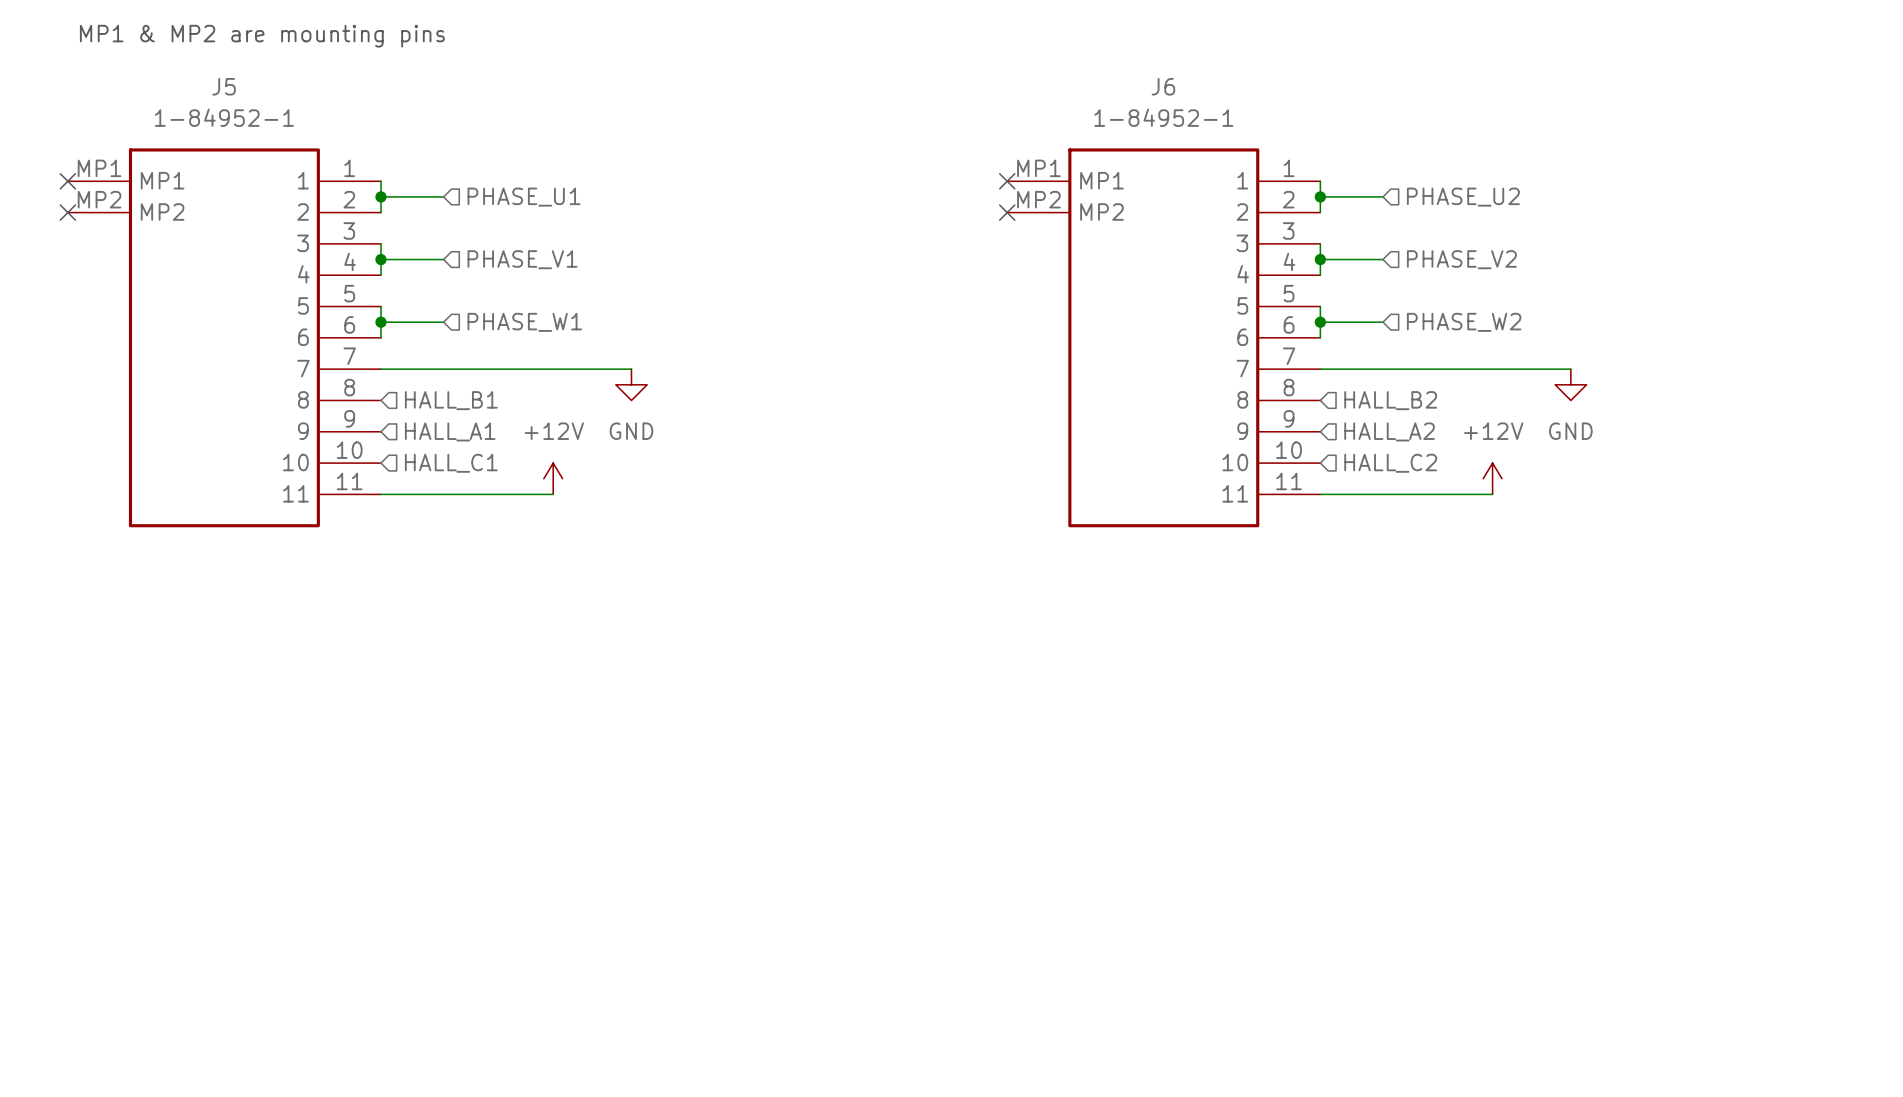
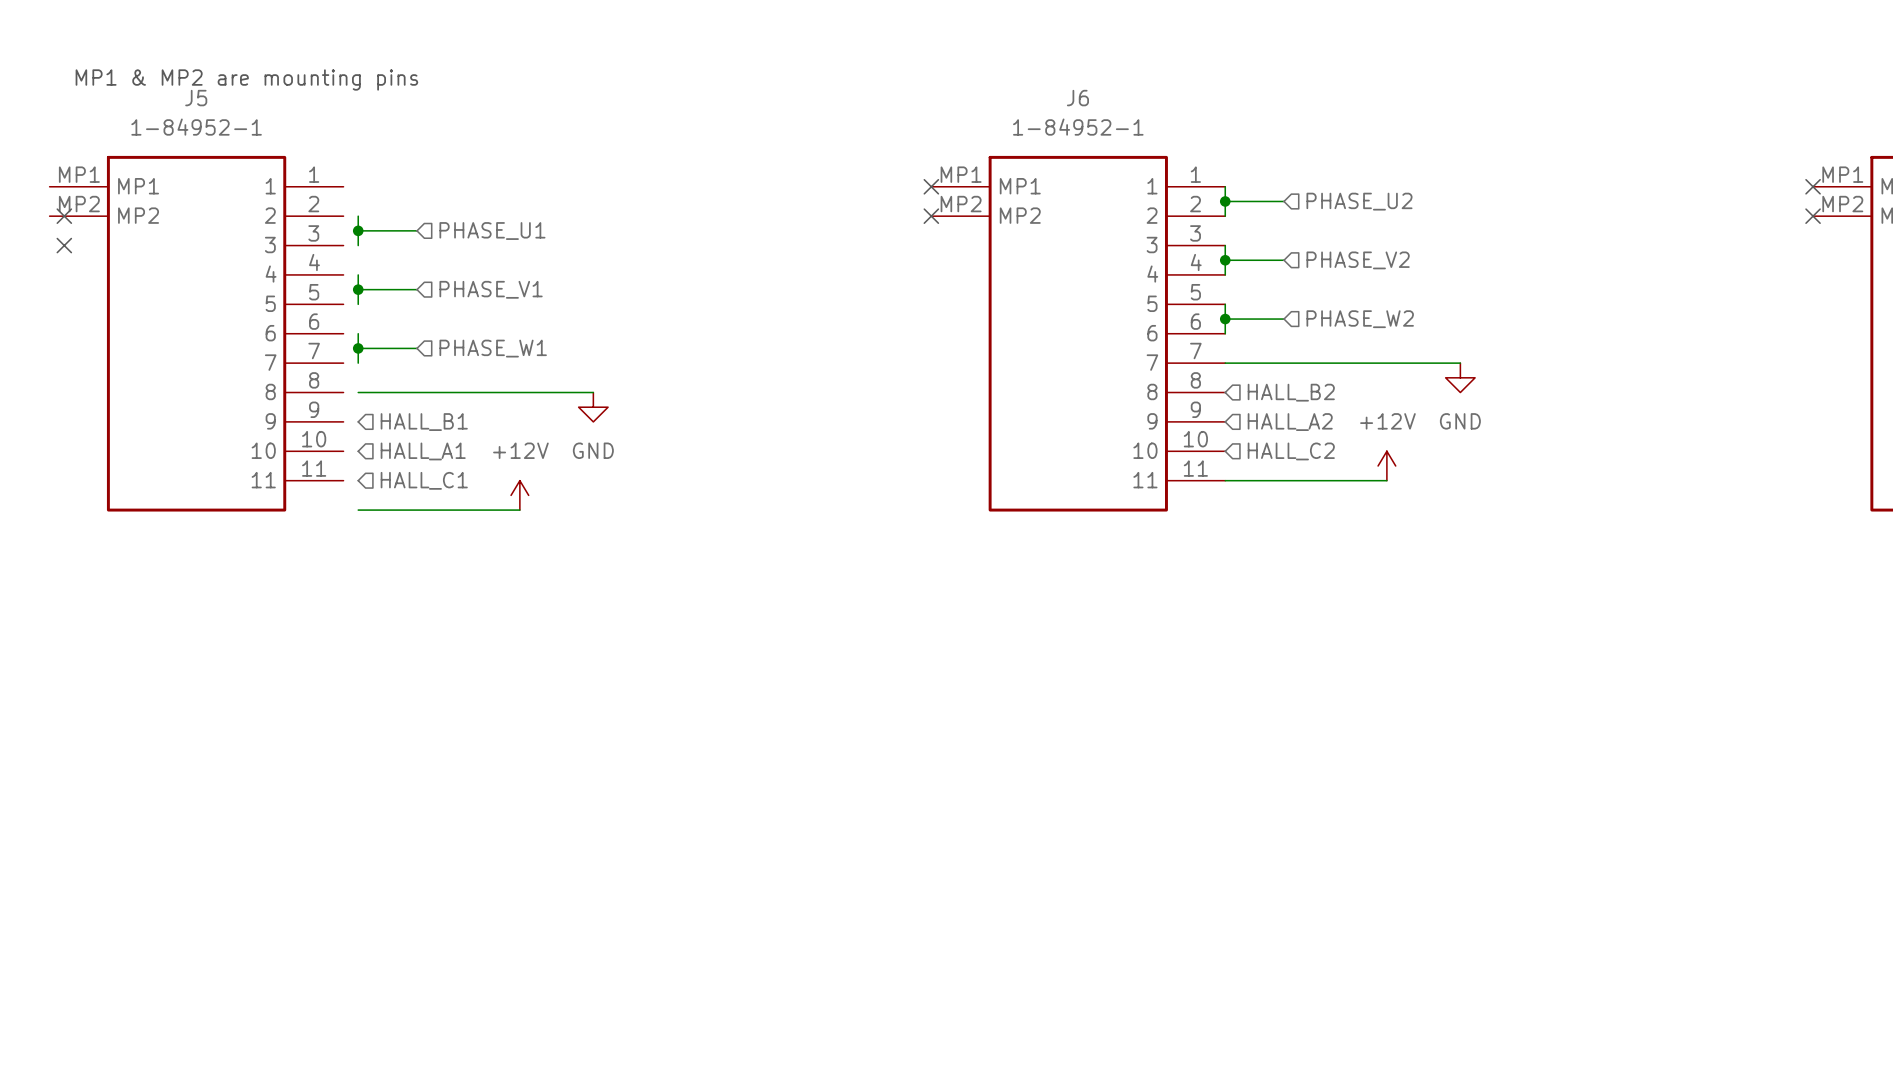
text position: MP1 & MP2 are mounting pins (262, 36) -> MP1 & MP2 are mounting pins (246, 79)
no-connect mark: (67, 181) -> none
wire: (380, 181) (380, 212) -> (358, 216) (358, 245)
wire: (380, 196) (443, 196) -> (358, 230) (417, 230)
junction: (380, 196) -> none
hierarchical label position: PHASE_U1 (524, 197) -> PHASE_U1 (492, 231)
no-connect mark position: (67, 212) -> (64, 216)
junction: none -> (358, 230)
no-connect mark: none -> (64, 245)
wire: (380, 243) (380, 275) -> (358, 274) (358, 304)
wire: (380, 259) (443, 259) -> (358, 289) (417, 289)
junction: (380, 259) -> none
hierarchical label position: PHASE_V1 (522, 259) -> PHASE_V1 (491, 289)
junction: none -> (358, 289)
wire: (380, 306) (380, 337) -> (358, 333) (358, 363)
wire: (380, 322) (443, 322) -> (358, 348) (417, 348)
junction: (380, 322) -> none
hierarchical label position: PHASE_W1 (524, 322) -> PHASE_W1 (493, 348)
junction: none -> (358, 348)
wire: (380, 369) (631, 369) -> (358, 392) (593, 392)
power symbol position: GND (631, 384) -> GND (593, 407)
hierarchical label position: HALL_B1 (451, 400) -> HALL_B1 (424, 422)
hierarchical label position: HALL_A1 (450, 431) -> HALL_A1 (423, 451)
hierarchical label position: HALL_C1 (451, 463) -> HALL_C1 (424, 480)
power symbol position: +12V (553, 478) -> +12V (519, 495)
wire: (380, 494) (553, 494) -> (358, 510) (519, 510)

